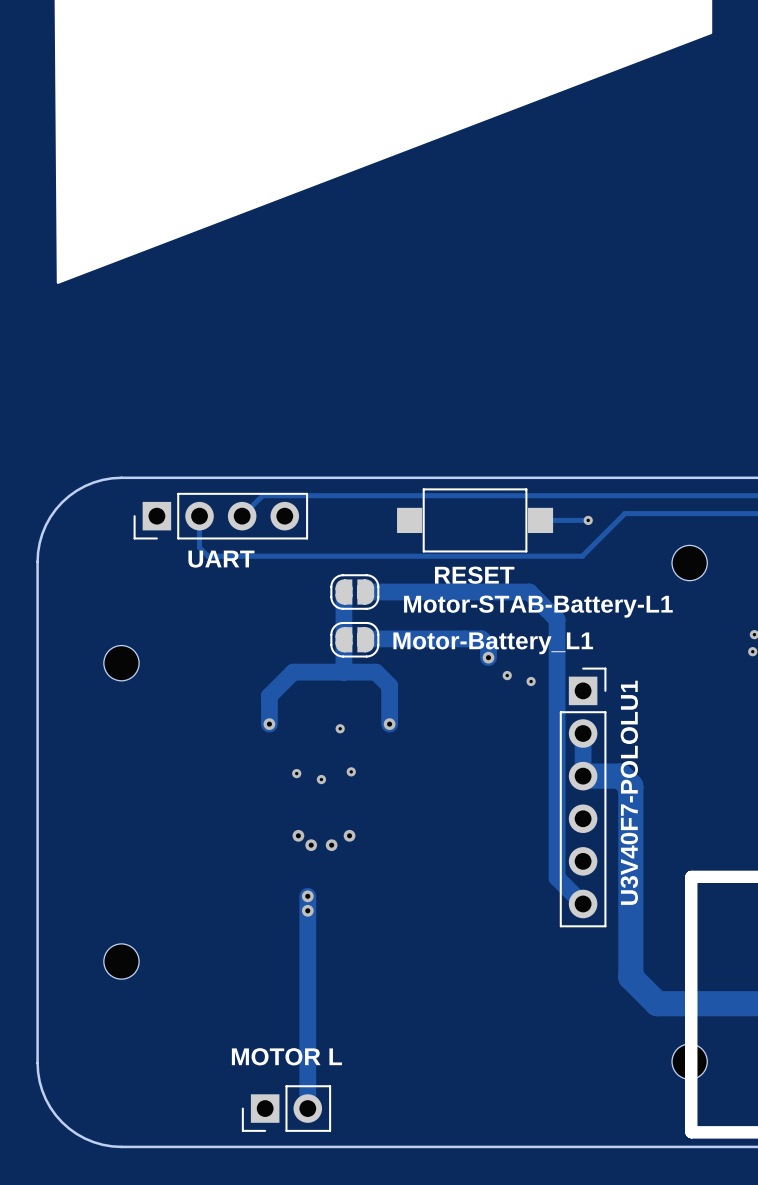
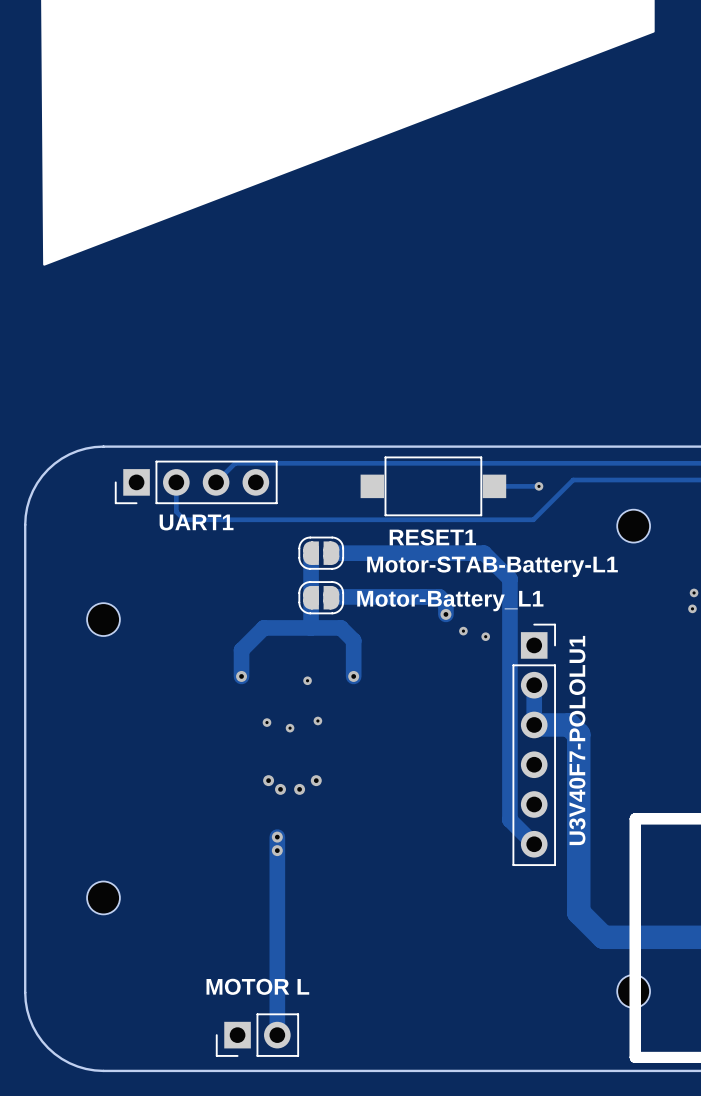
UART name: UART (221, 559) -> UART1 (196, 522)
RESET name: RESET (474, 575) -> RESET1 (432, 537)

